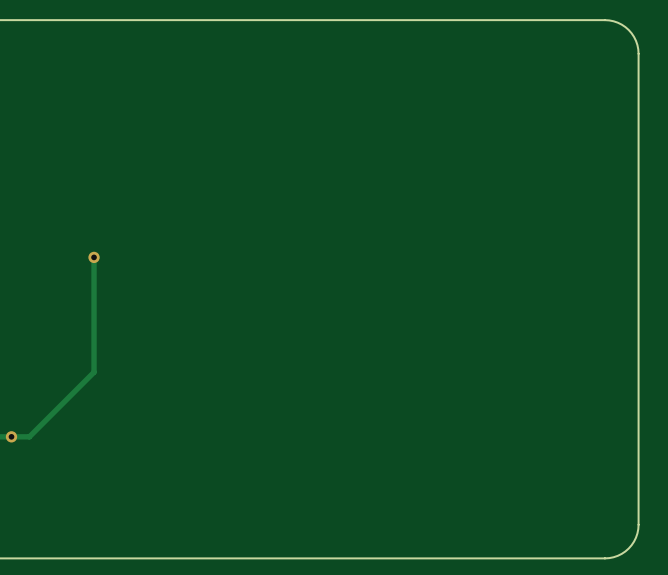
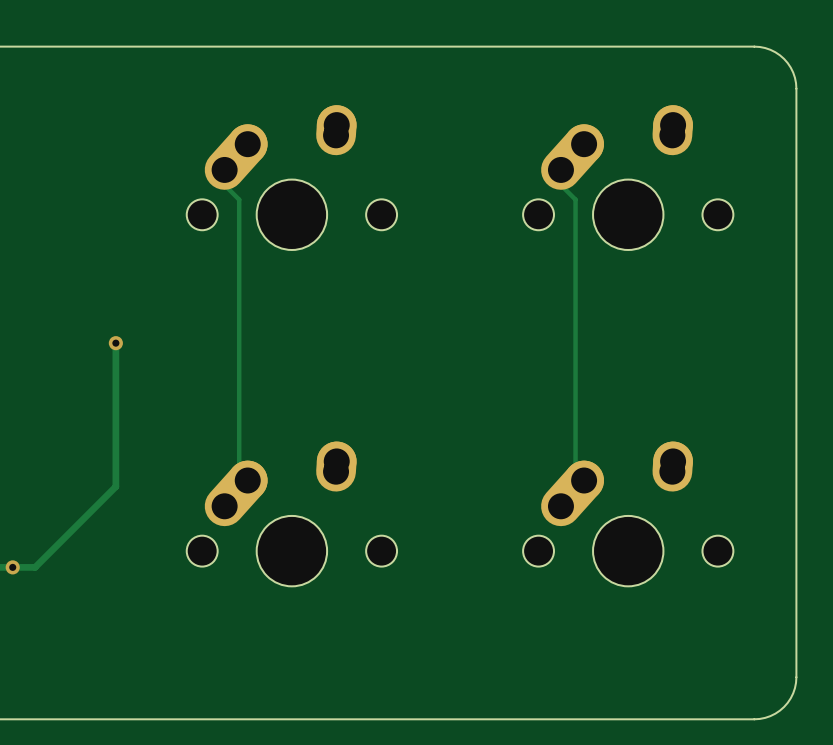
track: none -> (224, 169) (224, 185) (239, 199) (239, 471) (247, 480)
track: none -> (560, 169) (560, 185) (575, 199) (575, 471) (584, 480)
part: none -> (291, 177)
part: none -> (628, 177)
part: none -> (291, 513)
part: none -> (628, 513)

